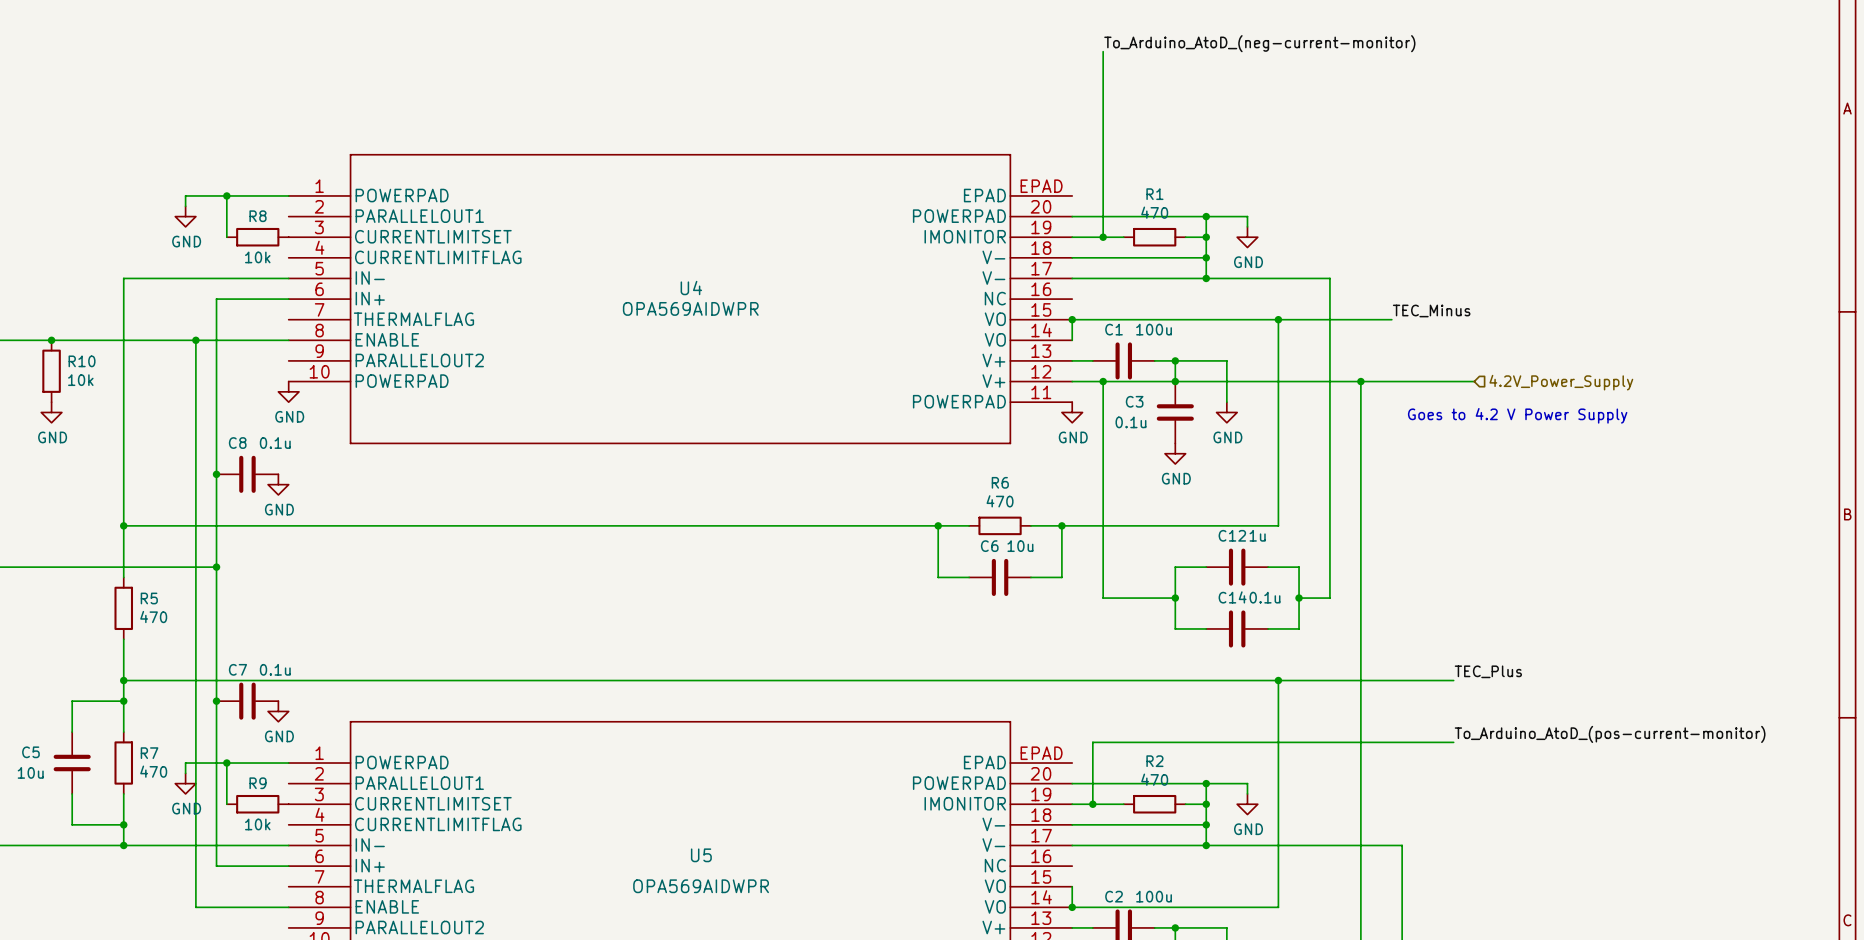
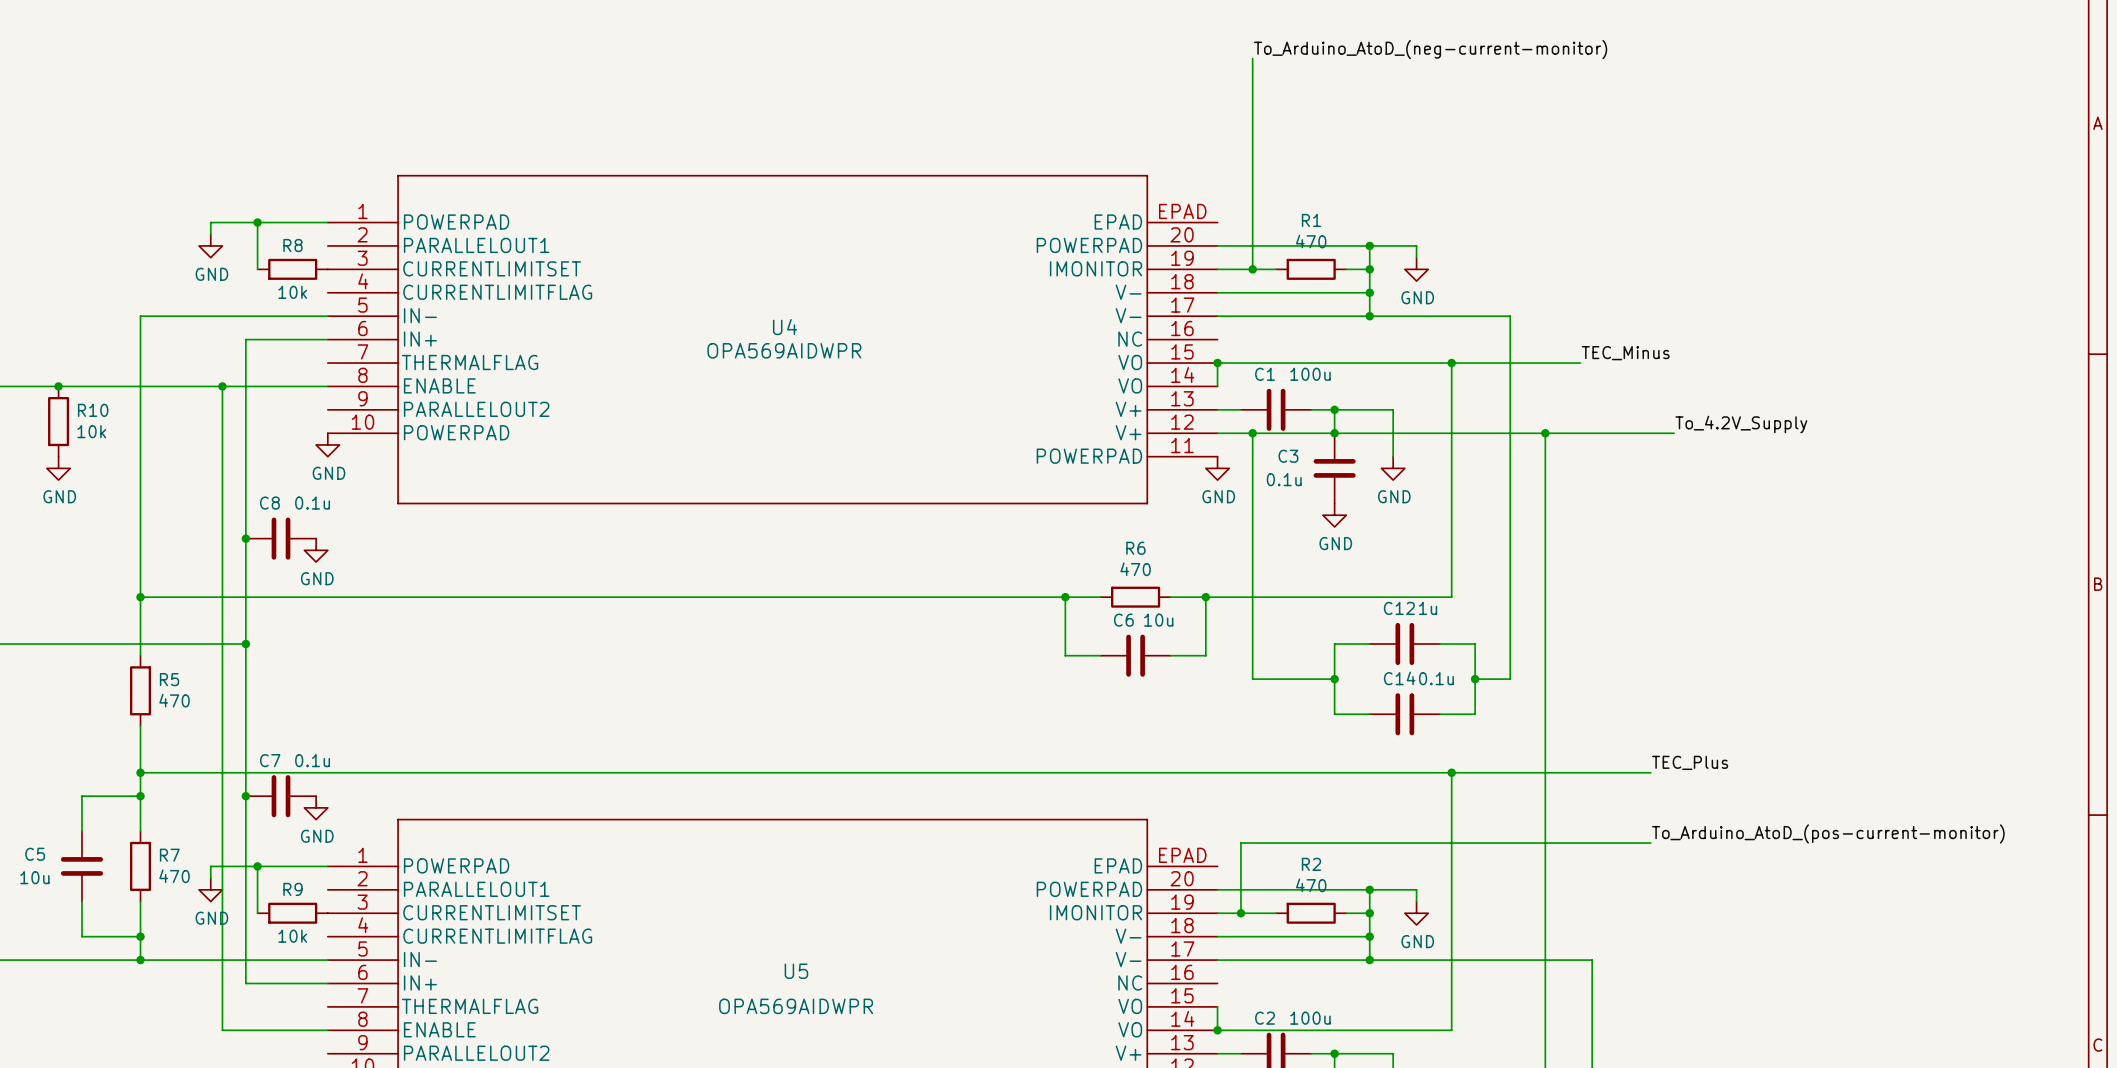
label: none -> To_4.2V_Supply (1741, 424)
hierarchical label: 4.2V_Power_Supply (1561, 382) -> none
text: Goes to 4.2 V Power Supply (1517, 415) -> none

